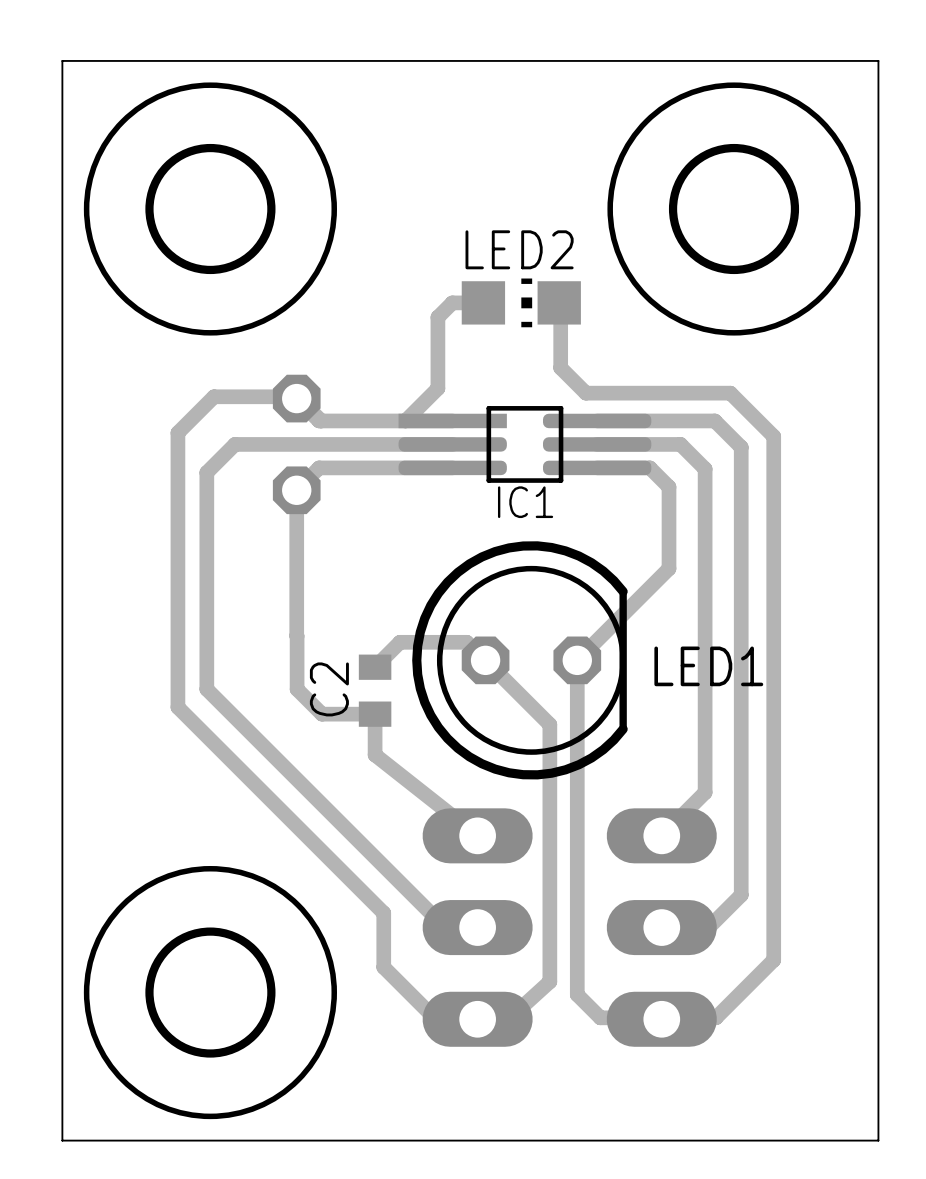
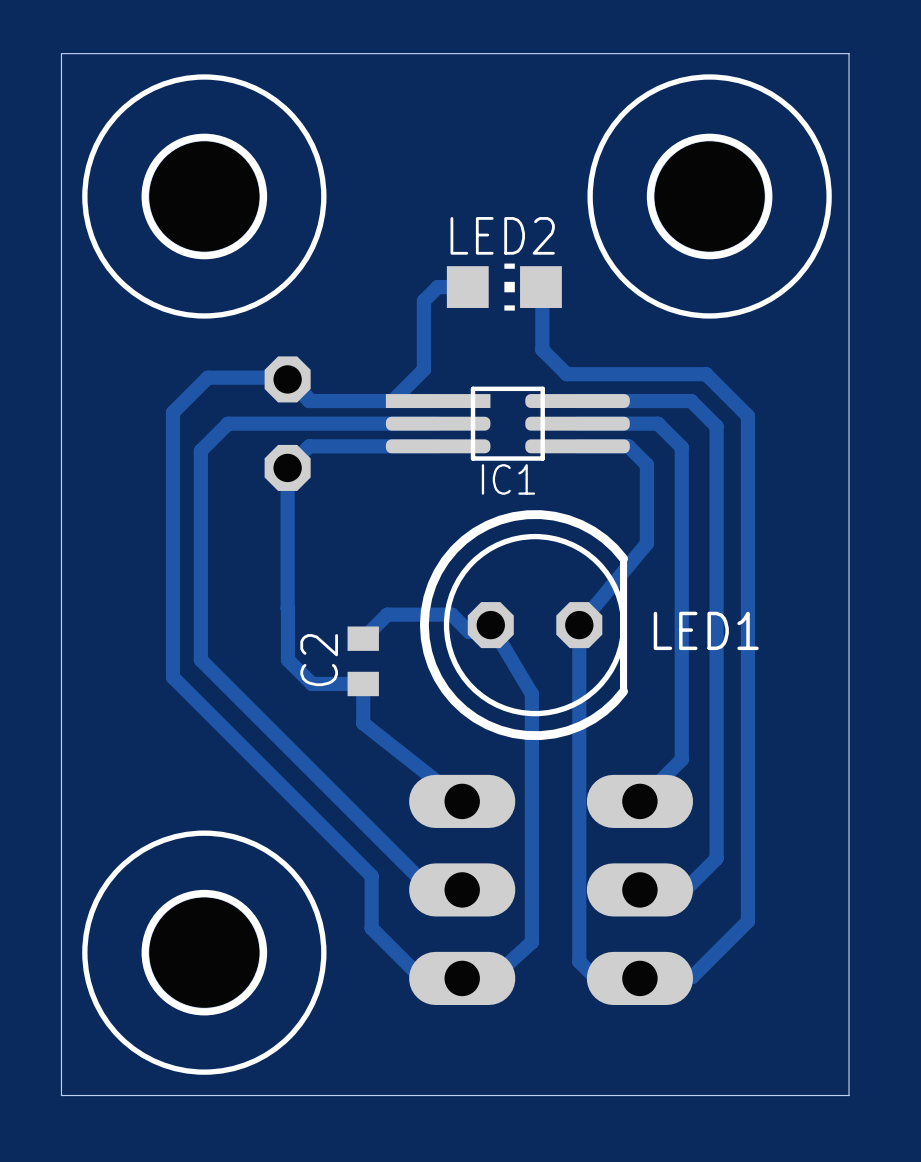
track: (669, 568) (577, 660) (577, 994) (600, 1017) (614, 1017) -> (646, 543) (579, 625) (579, 961) (594, 977)
track: (485, 660) (549, 724) -> (469, 632) (490, 625) (531, 694)
LED1 position: (519, 660) -> (523, 625)

